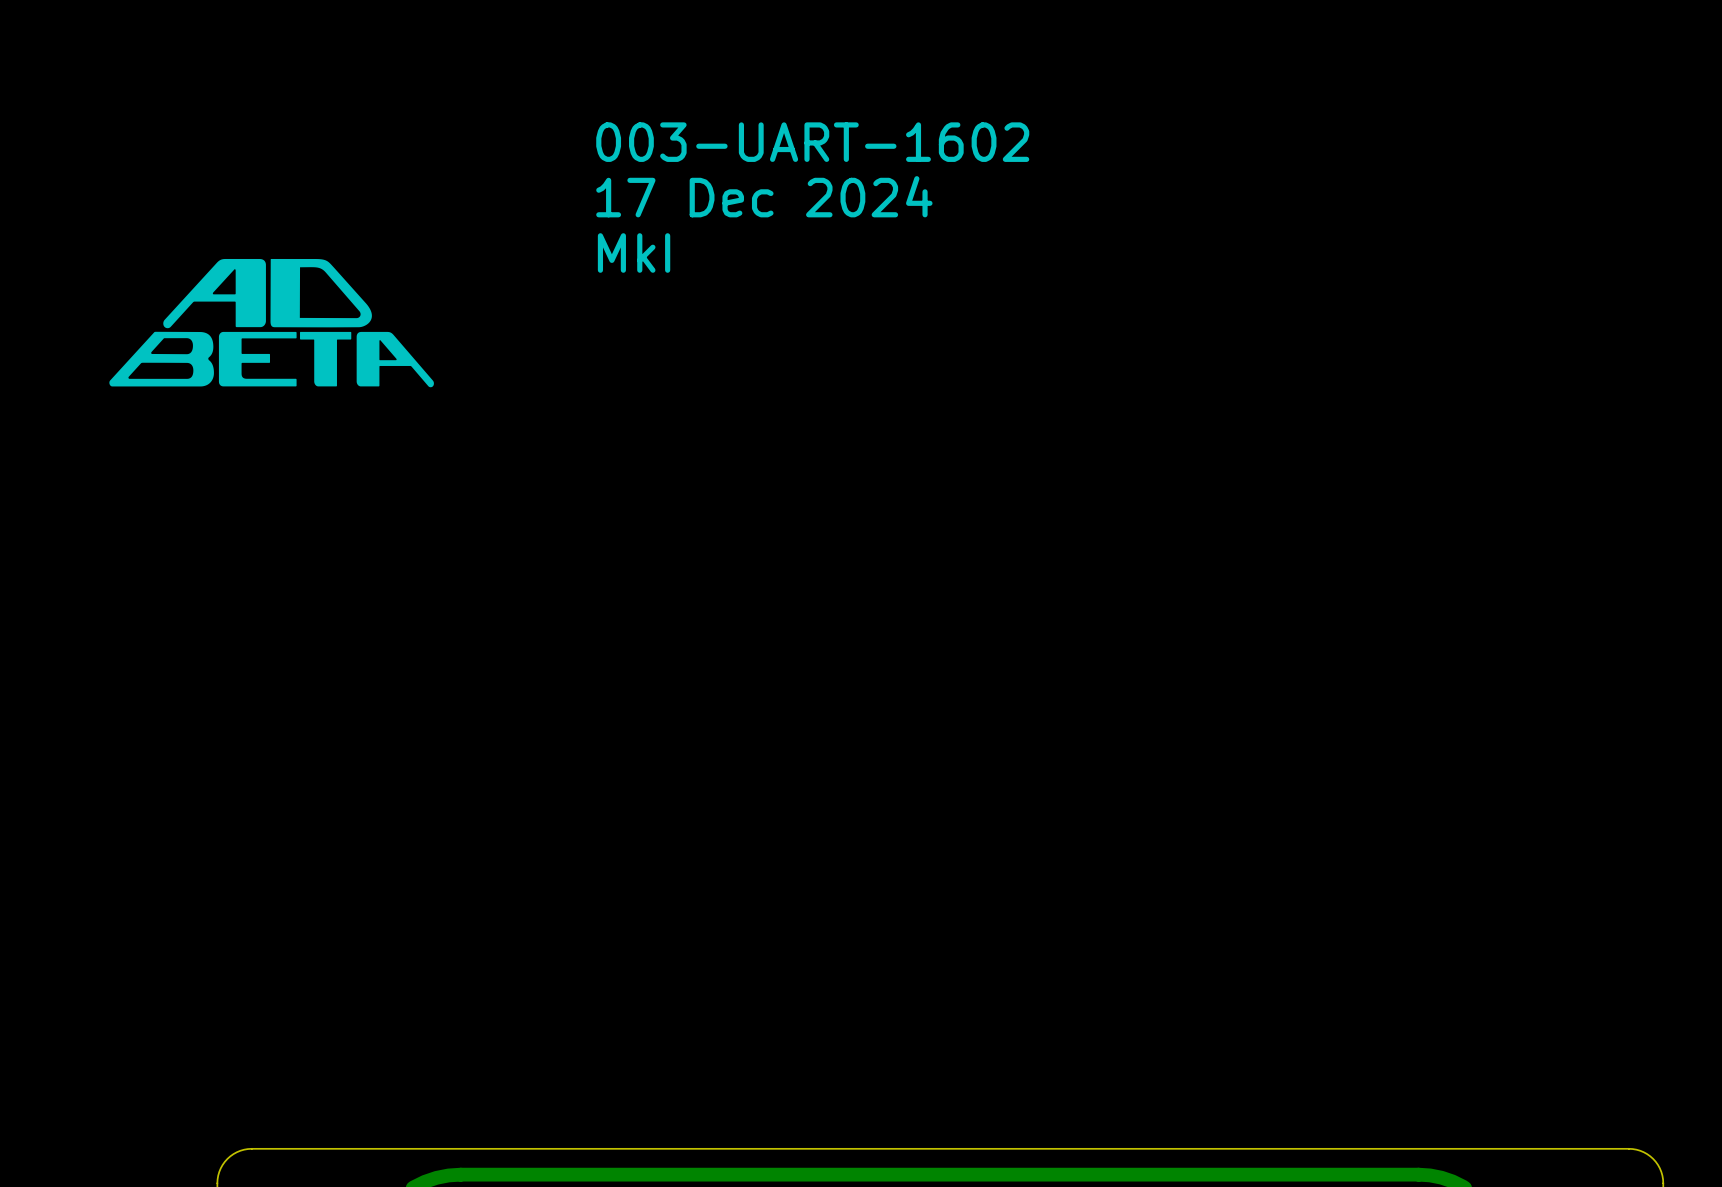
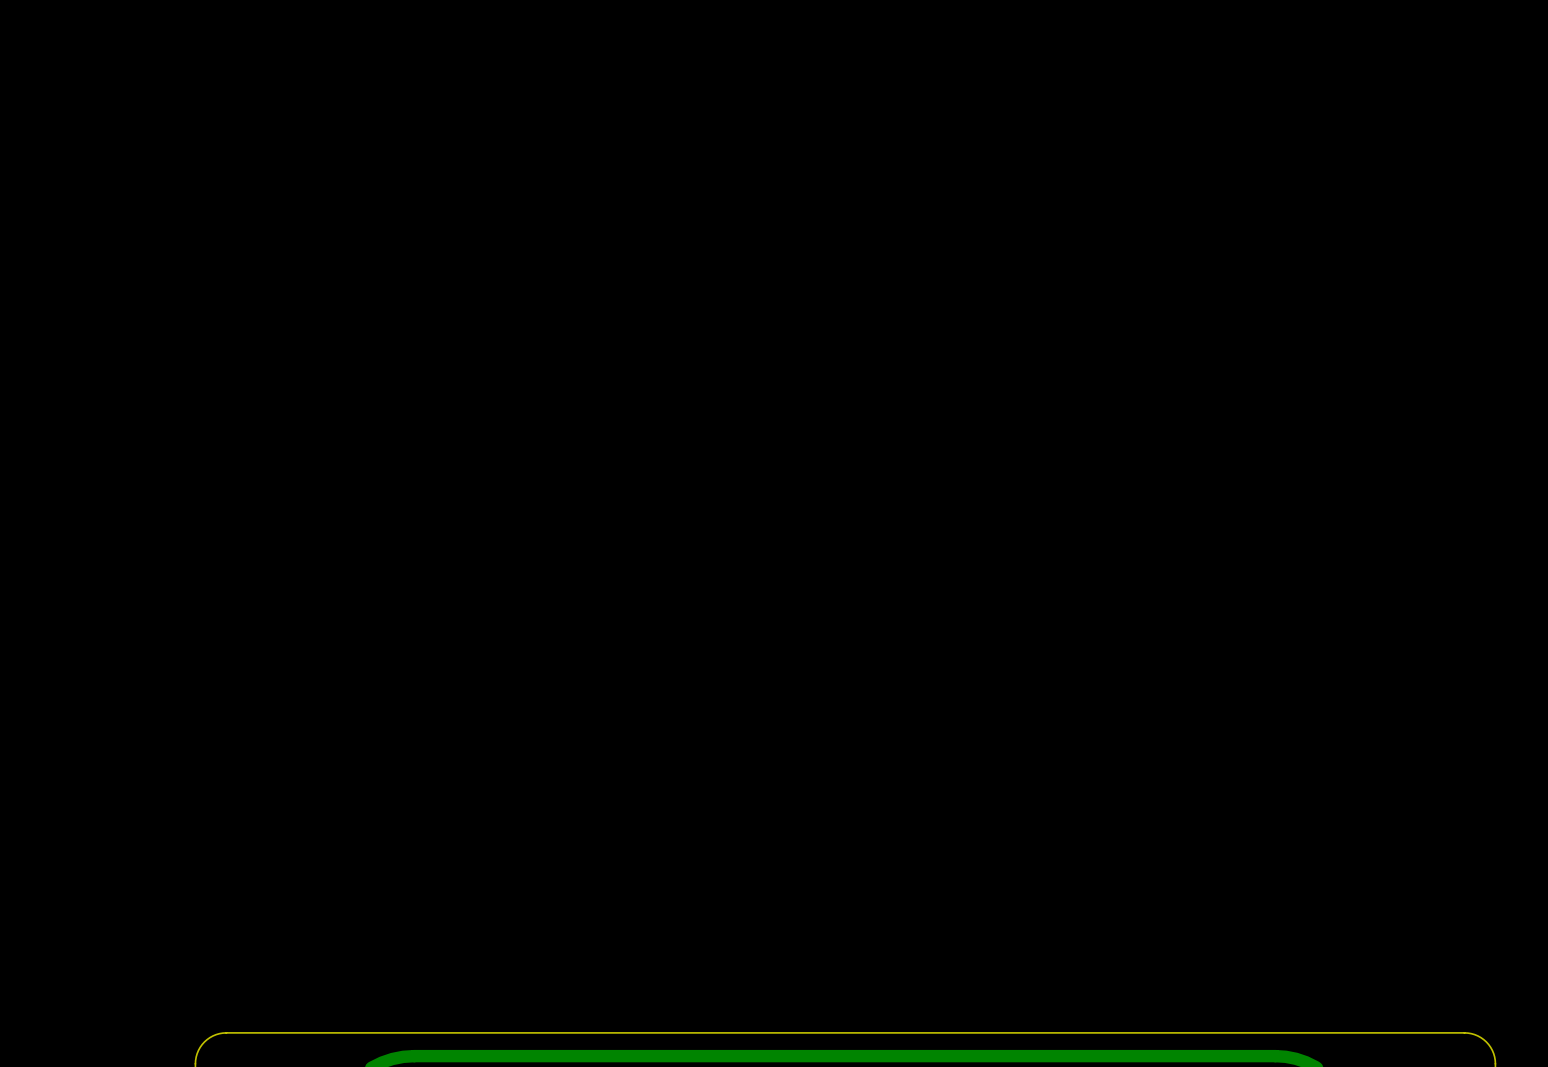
text: 003-UART-1602 (812, 142) -> none
text: 17 Dec 2024 (764, 196) -> none
text: MkI (634, 252) -> none
drawing: [109, 258, 434, 388] -> none

